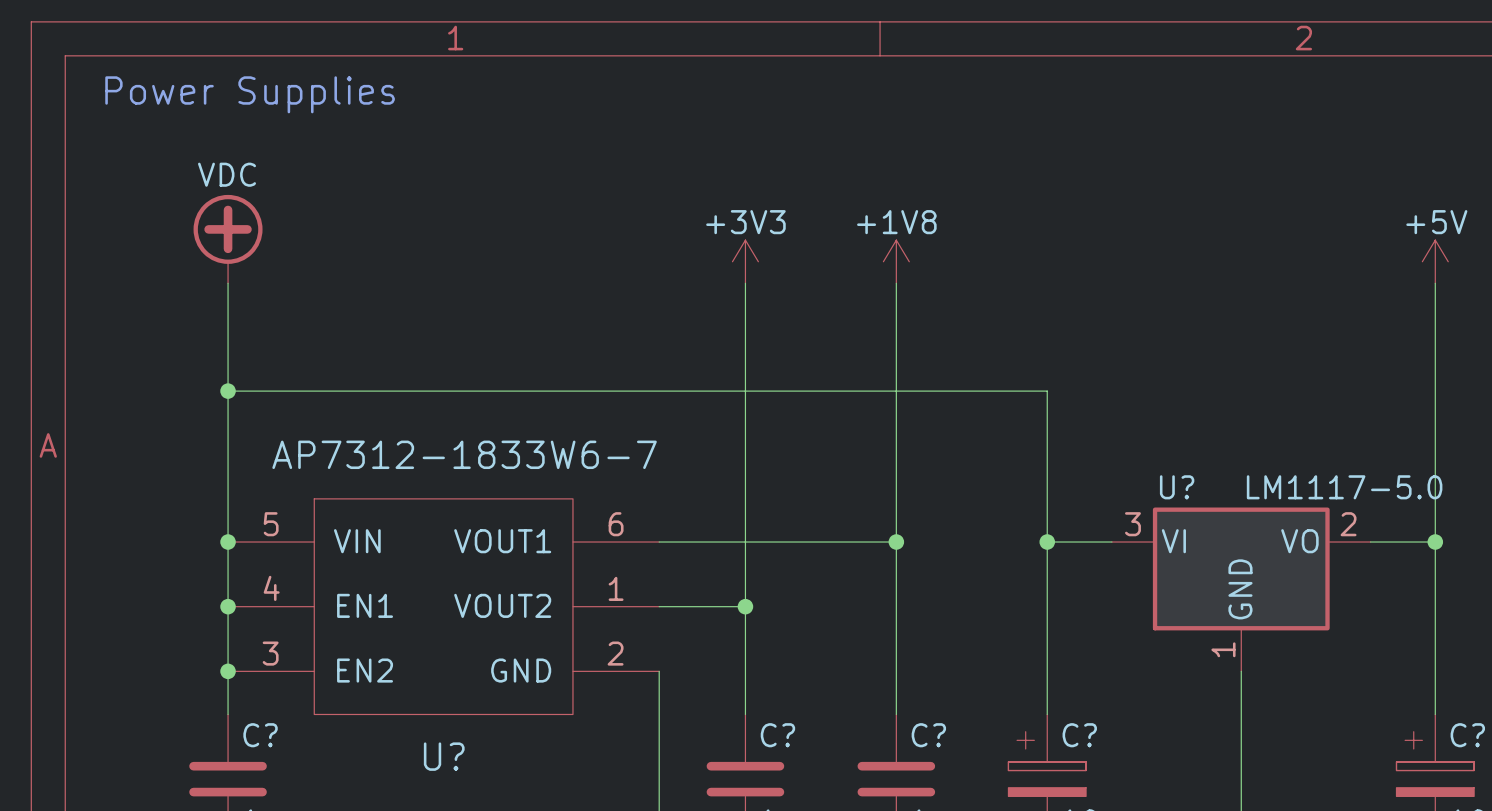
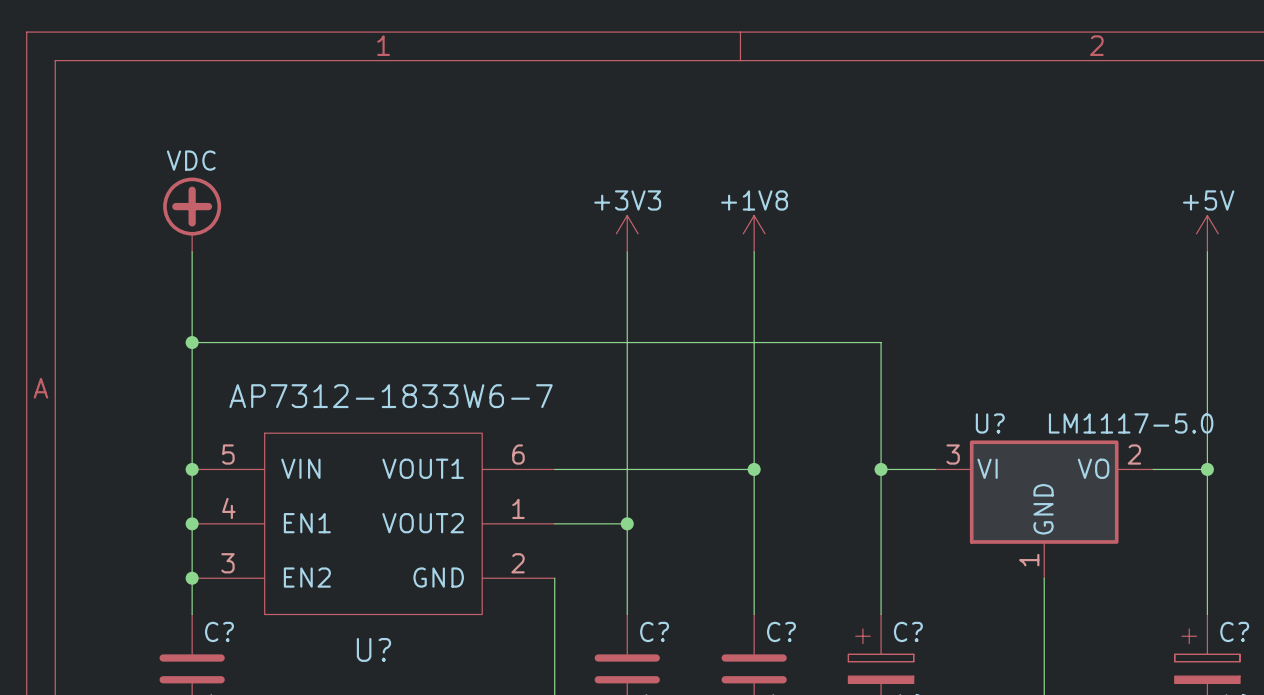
text: Power Supplies (250, 94) -> none

